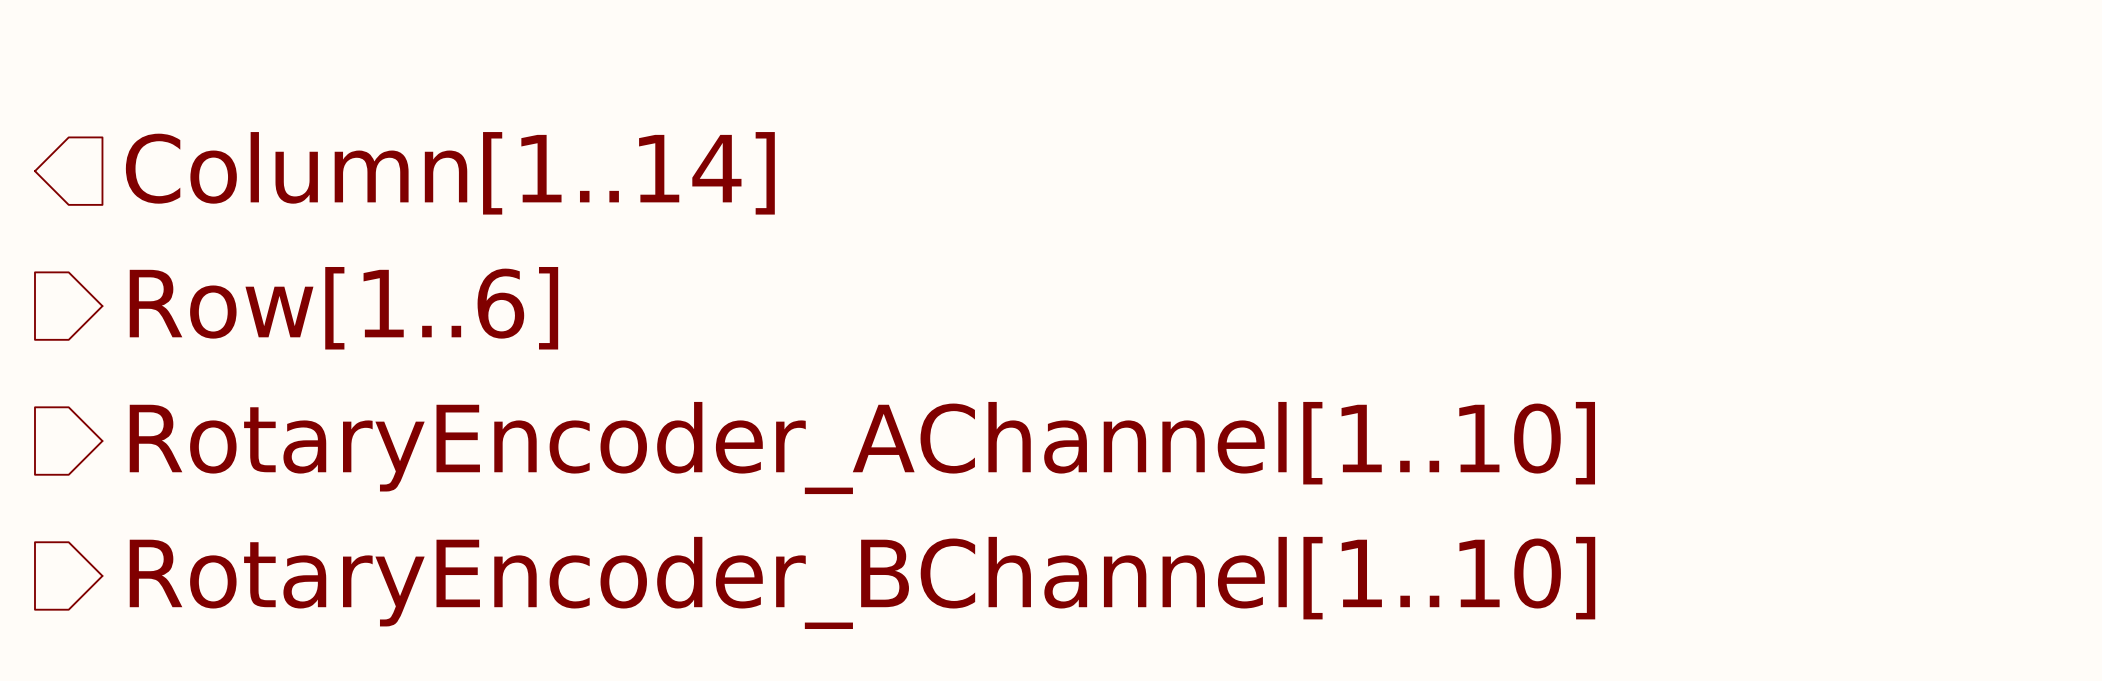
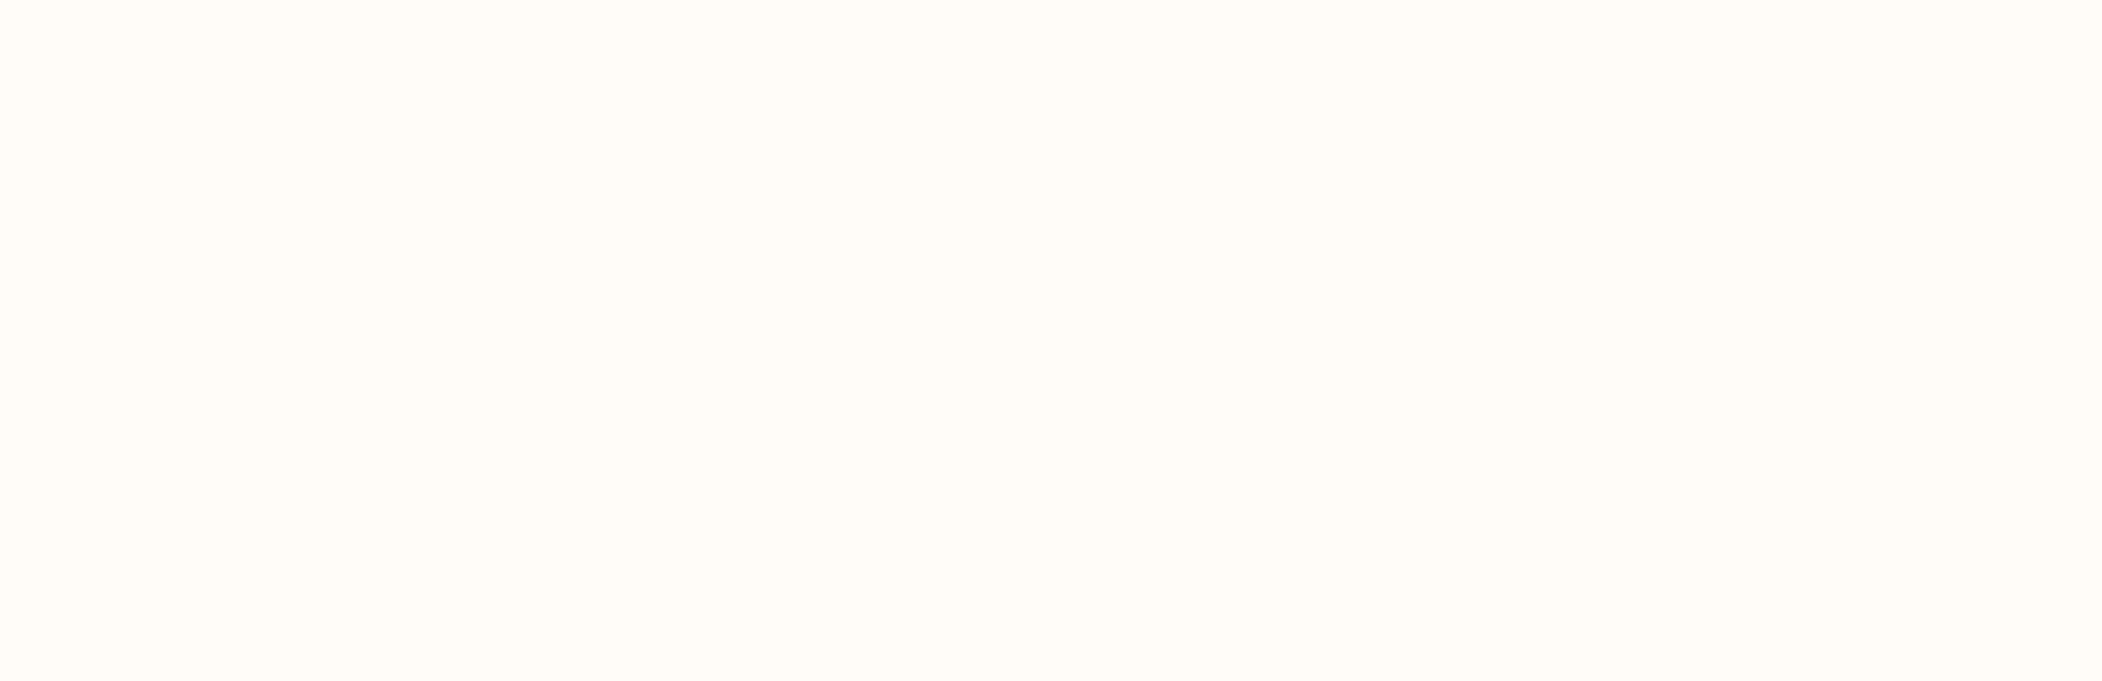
hierarchical label: Column[1..14] (450, 173) -> none
hierarchical label: Row[1..6] (343, 308) -> none
hierarchical label: RotaryEncoder_AChannel[1..10] (862, 448) -> none
hierarchical label: RotaryEncoder_BChannel[1..10] (862, 582) -> none

